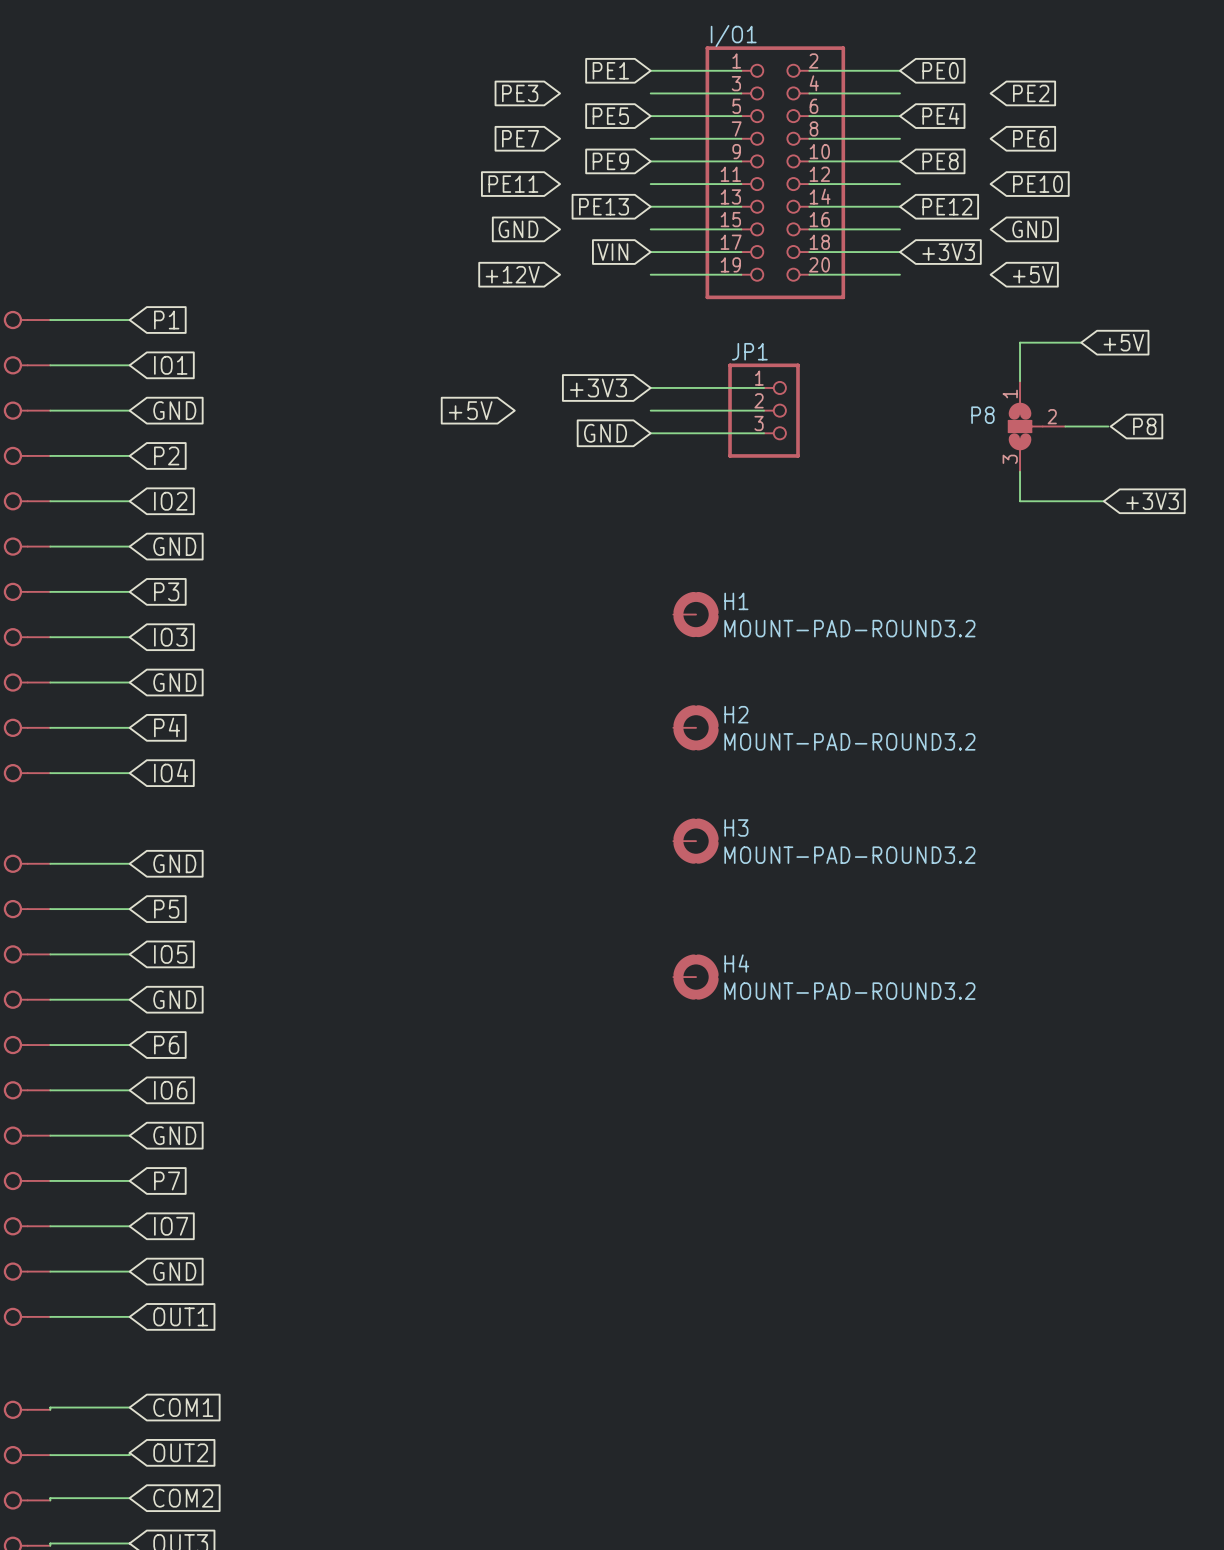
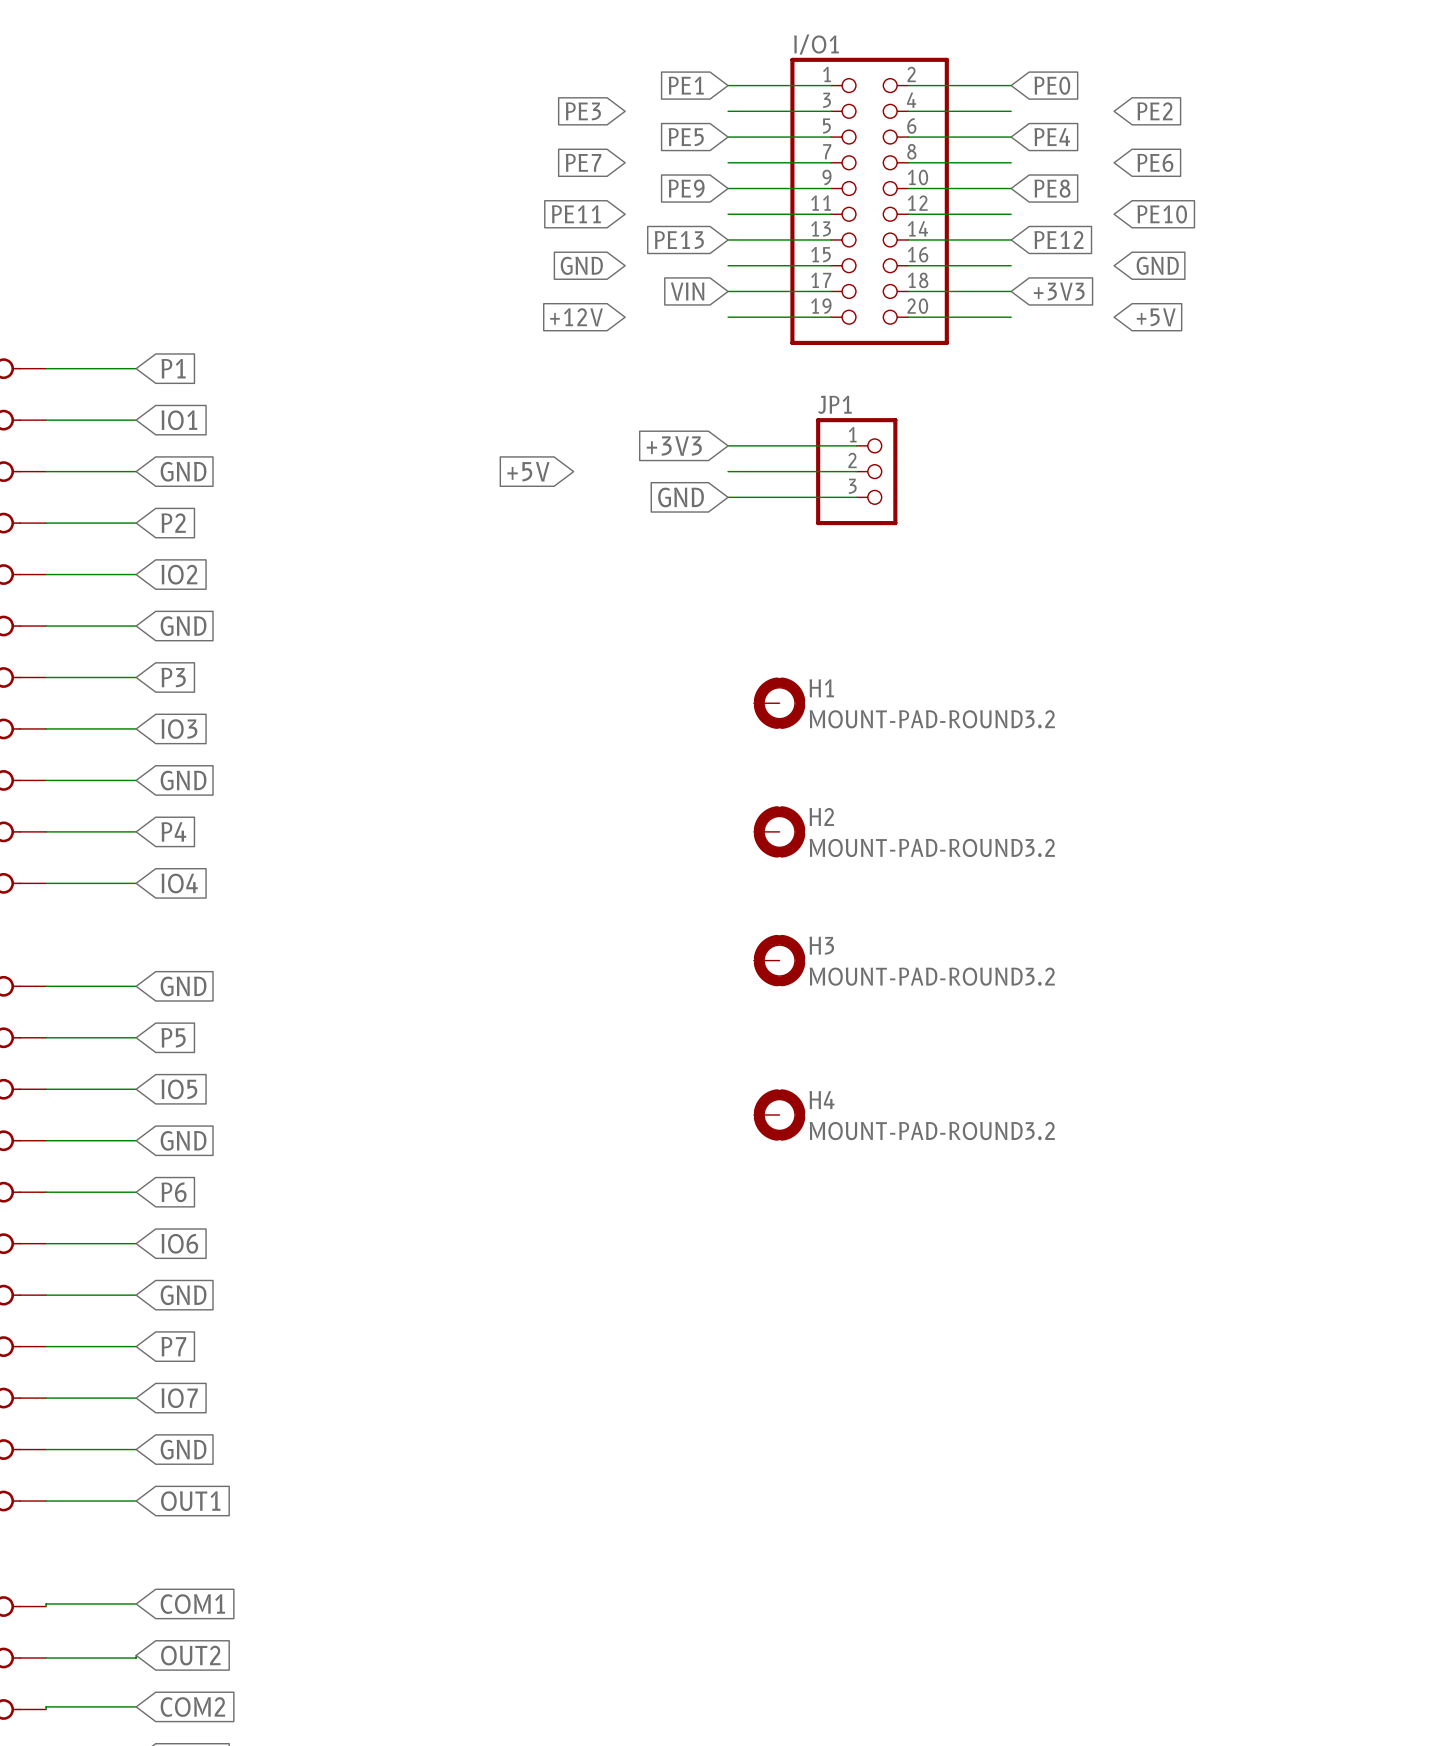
wire: (1081, 342) (1020, 342) (1020, 381) -> none
global label: +5V (1123, 342) -> none
P8: (1036, 426) -> none
wire: (1065, 426) (1108, 426) -> none
global label: P8 (1144, 426) -> none
wire: (1020, 471) (1020, 501) (1103, 501) -> none
global label: +3V3 (1152, 501) -> none

